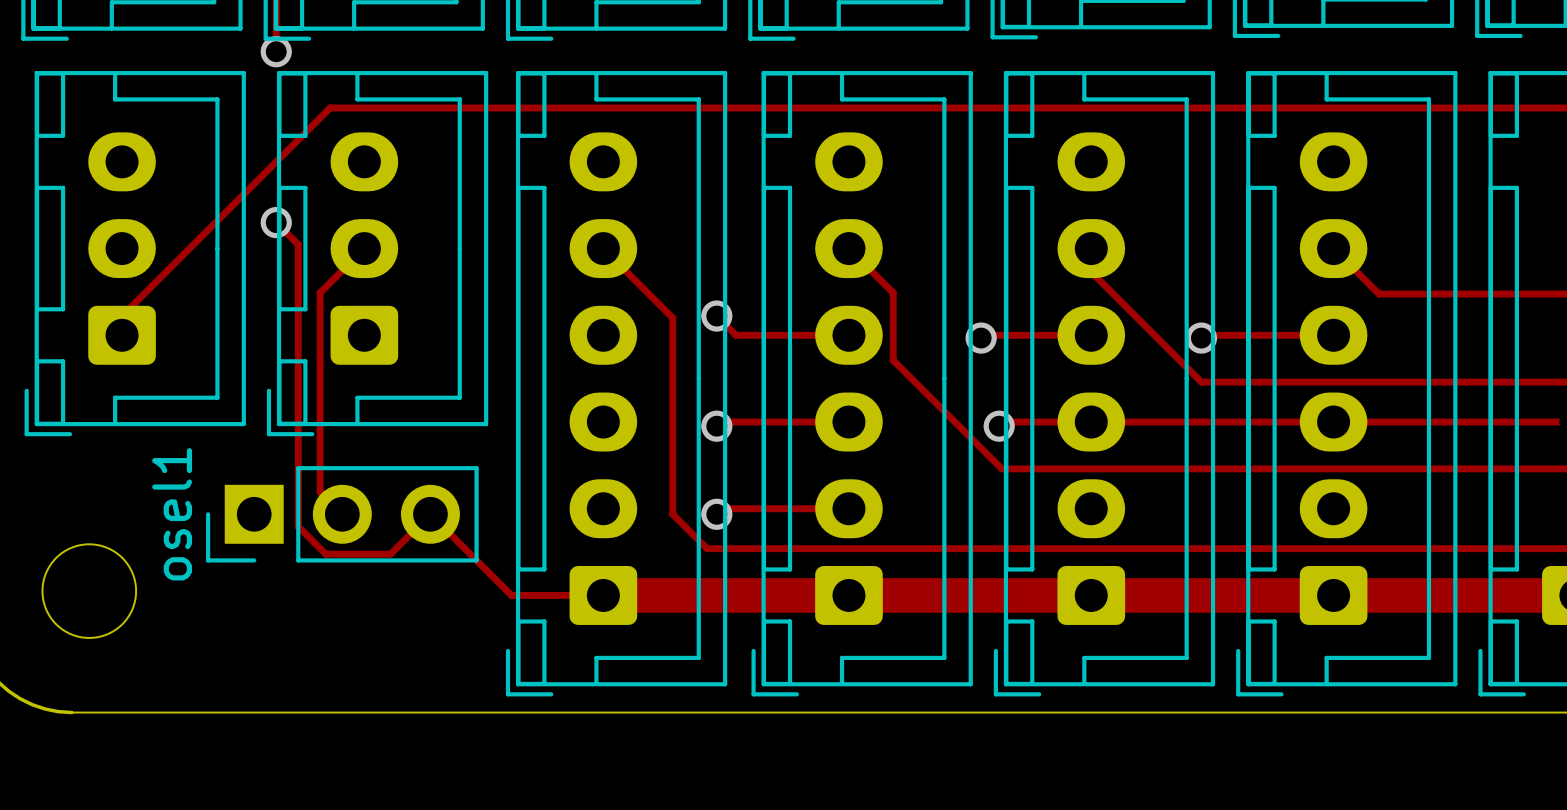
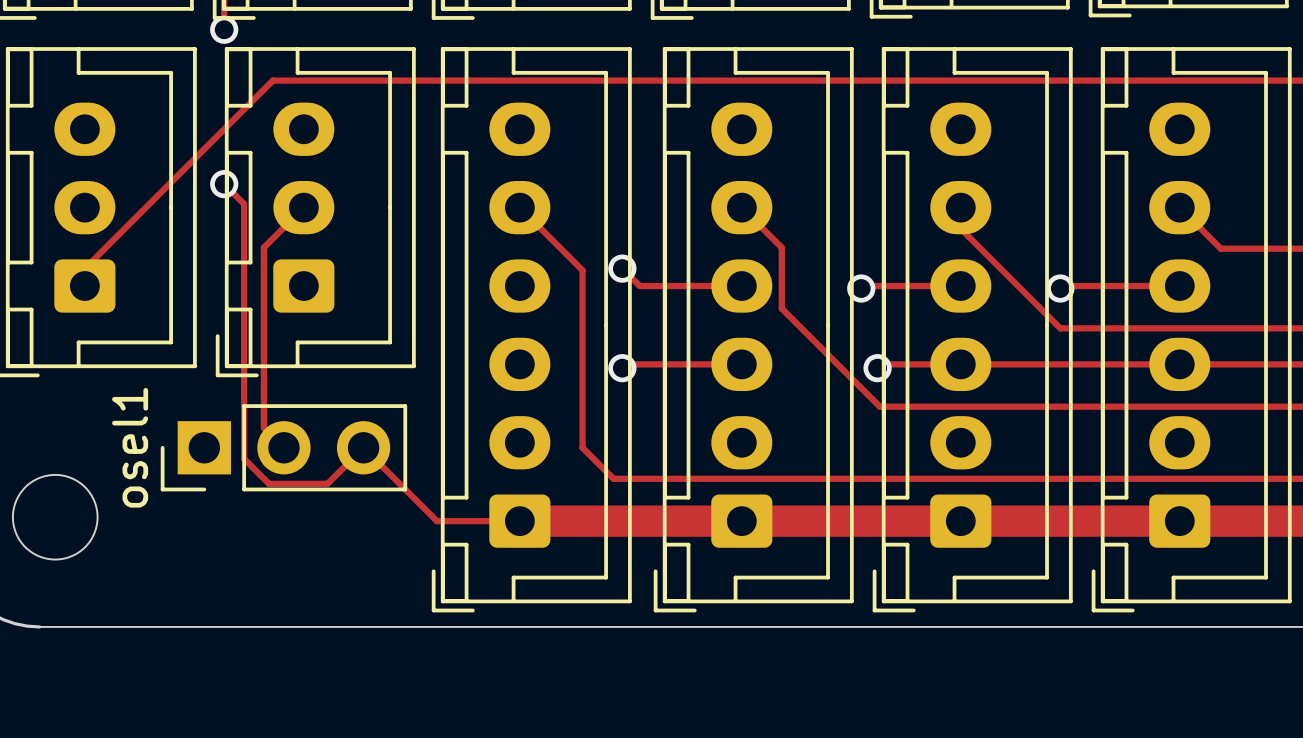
track: (848, 508) (722, 508) (716, 514) -> none
via: (716, 514) -> none

